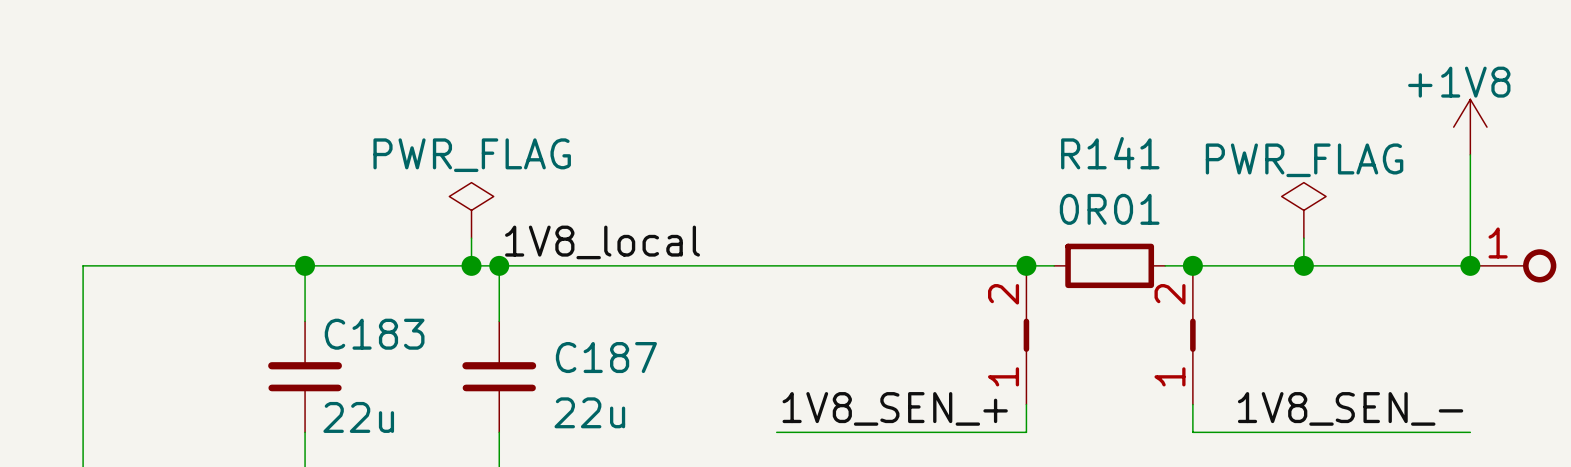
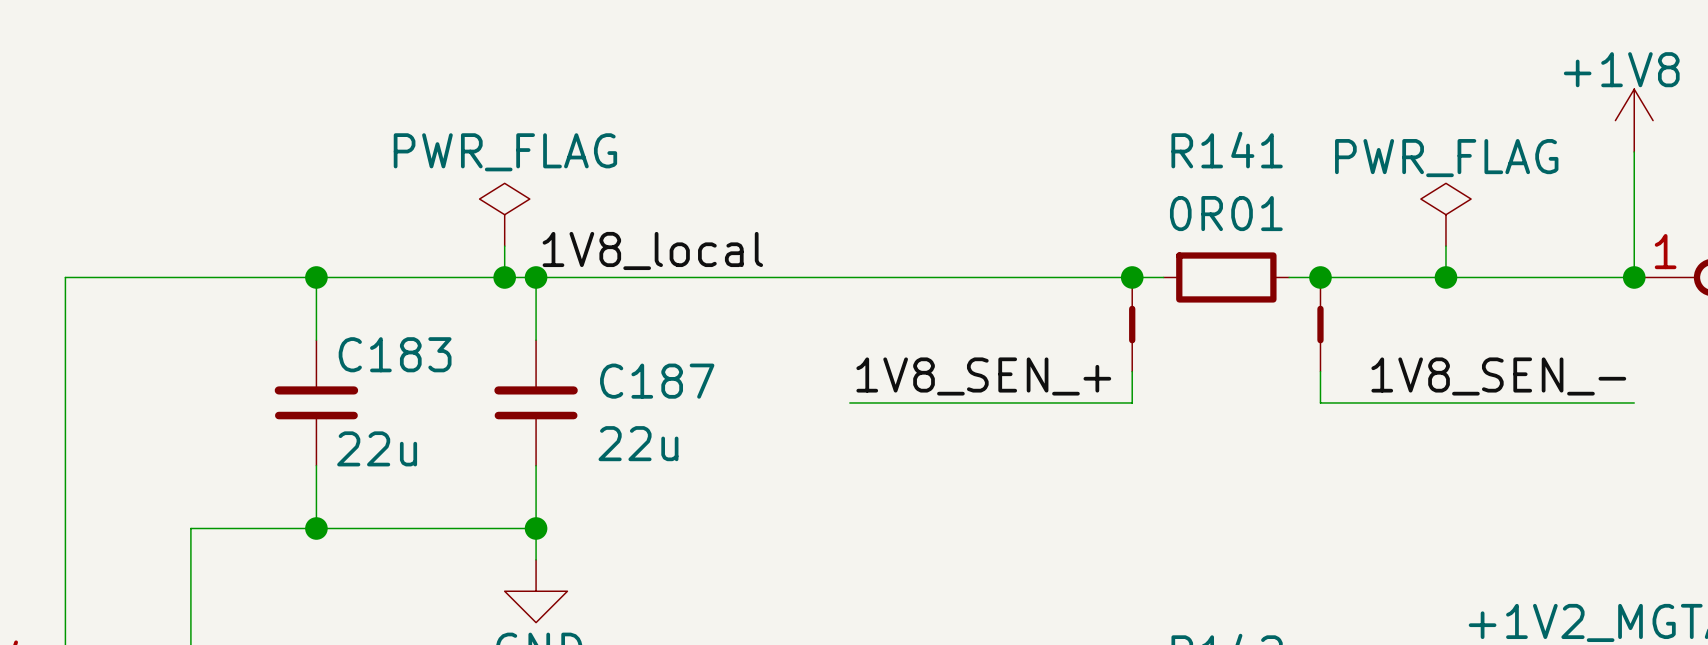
part: none -> (1132, 324)
part: none -> (1320, 324)
part: (1026, 335) -> none
part: (1192, 335) -> none
wire: (1026, 404) (1026, 432) (776, 432) -> (1132, 371) (1132, 402) (849, 402)
wire: (1192, 404) (1192, 432) (1470, 432) -> (1320, 371) (1320, 402) (1634, 402)
label position: 1V8_SEN_+ (895, 408) -> 1V8_SEN_+ (983, 376)
label position: 1V8_SEN_- (1350, 408) -> 1V8_SEN_- (1498, 376)

